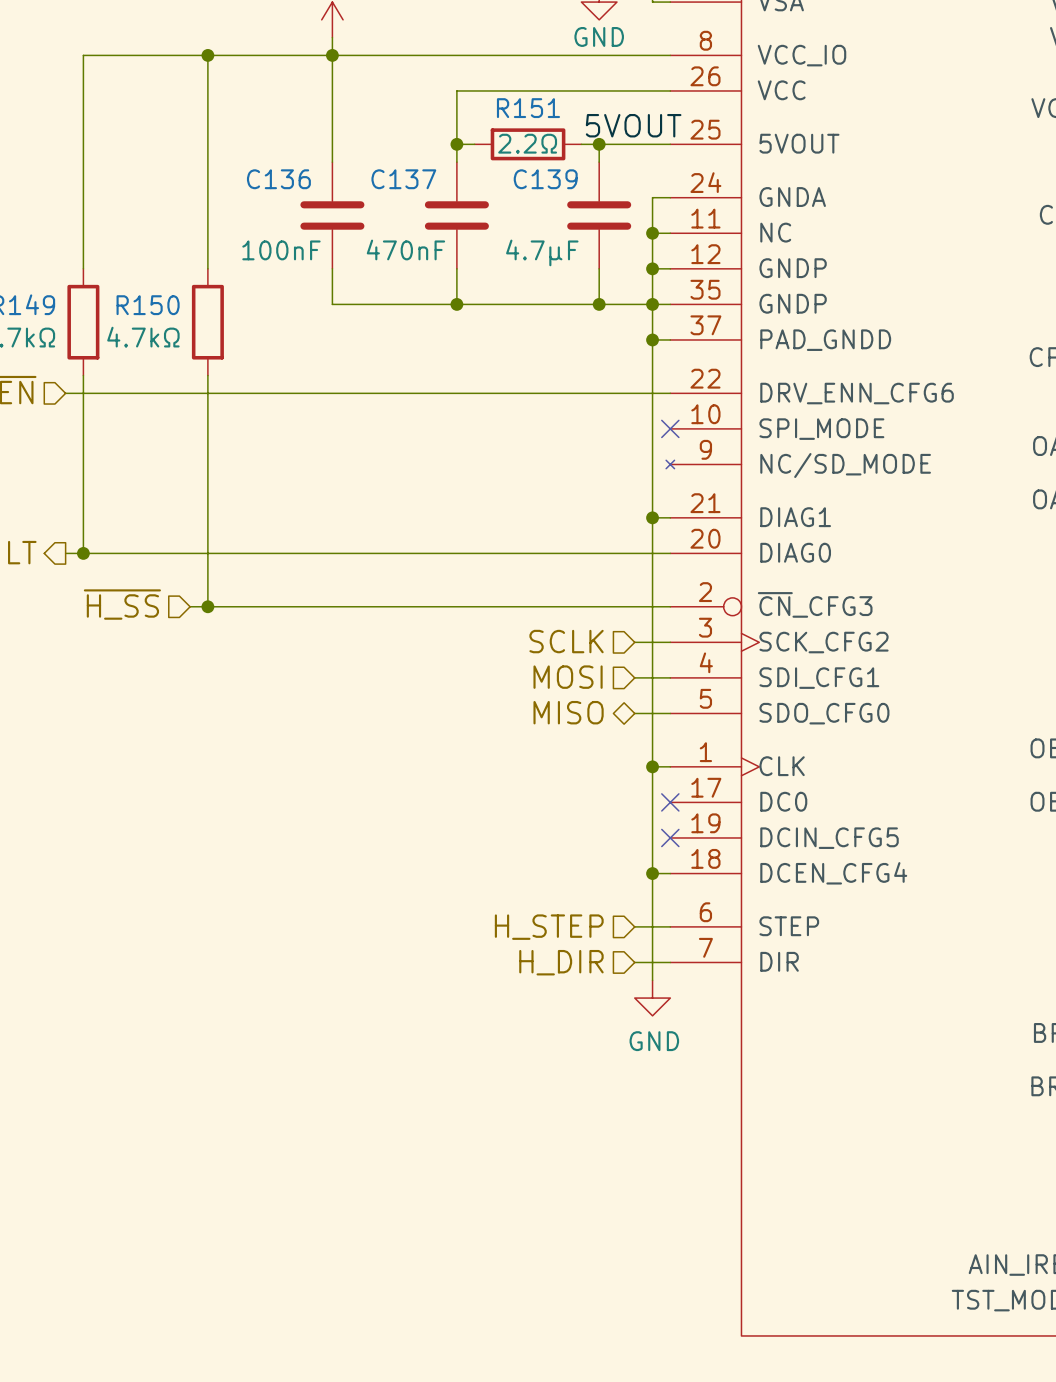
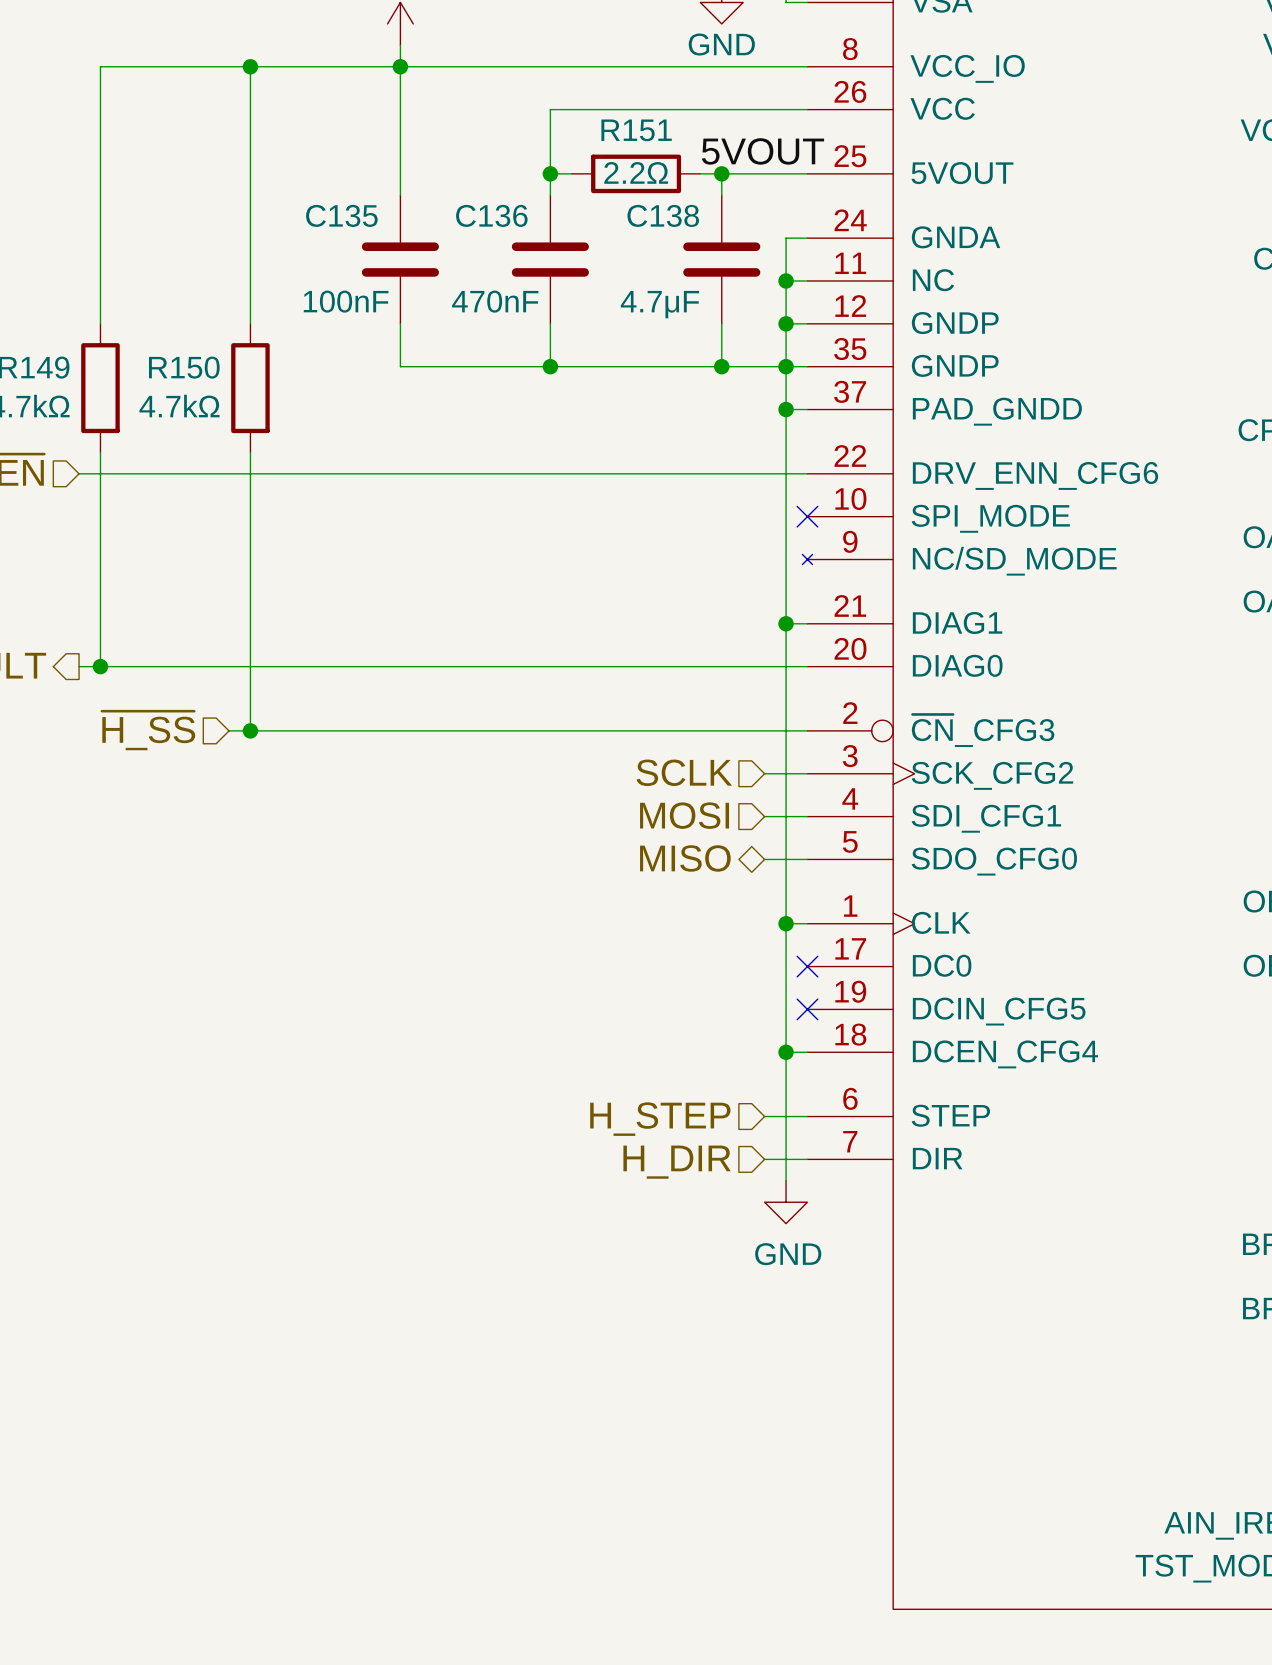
C136 name: C136 (278, 179) -> C135 (341, 215)
C137 name: C137 (403, 179) -> C136 (491, 215)
C139 name: C139 (545, 179) -> C138 (663, 215)

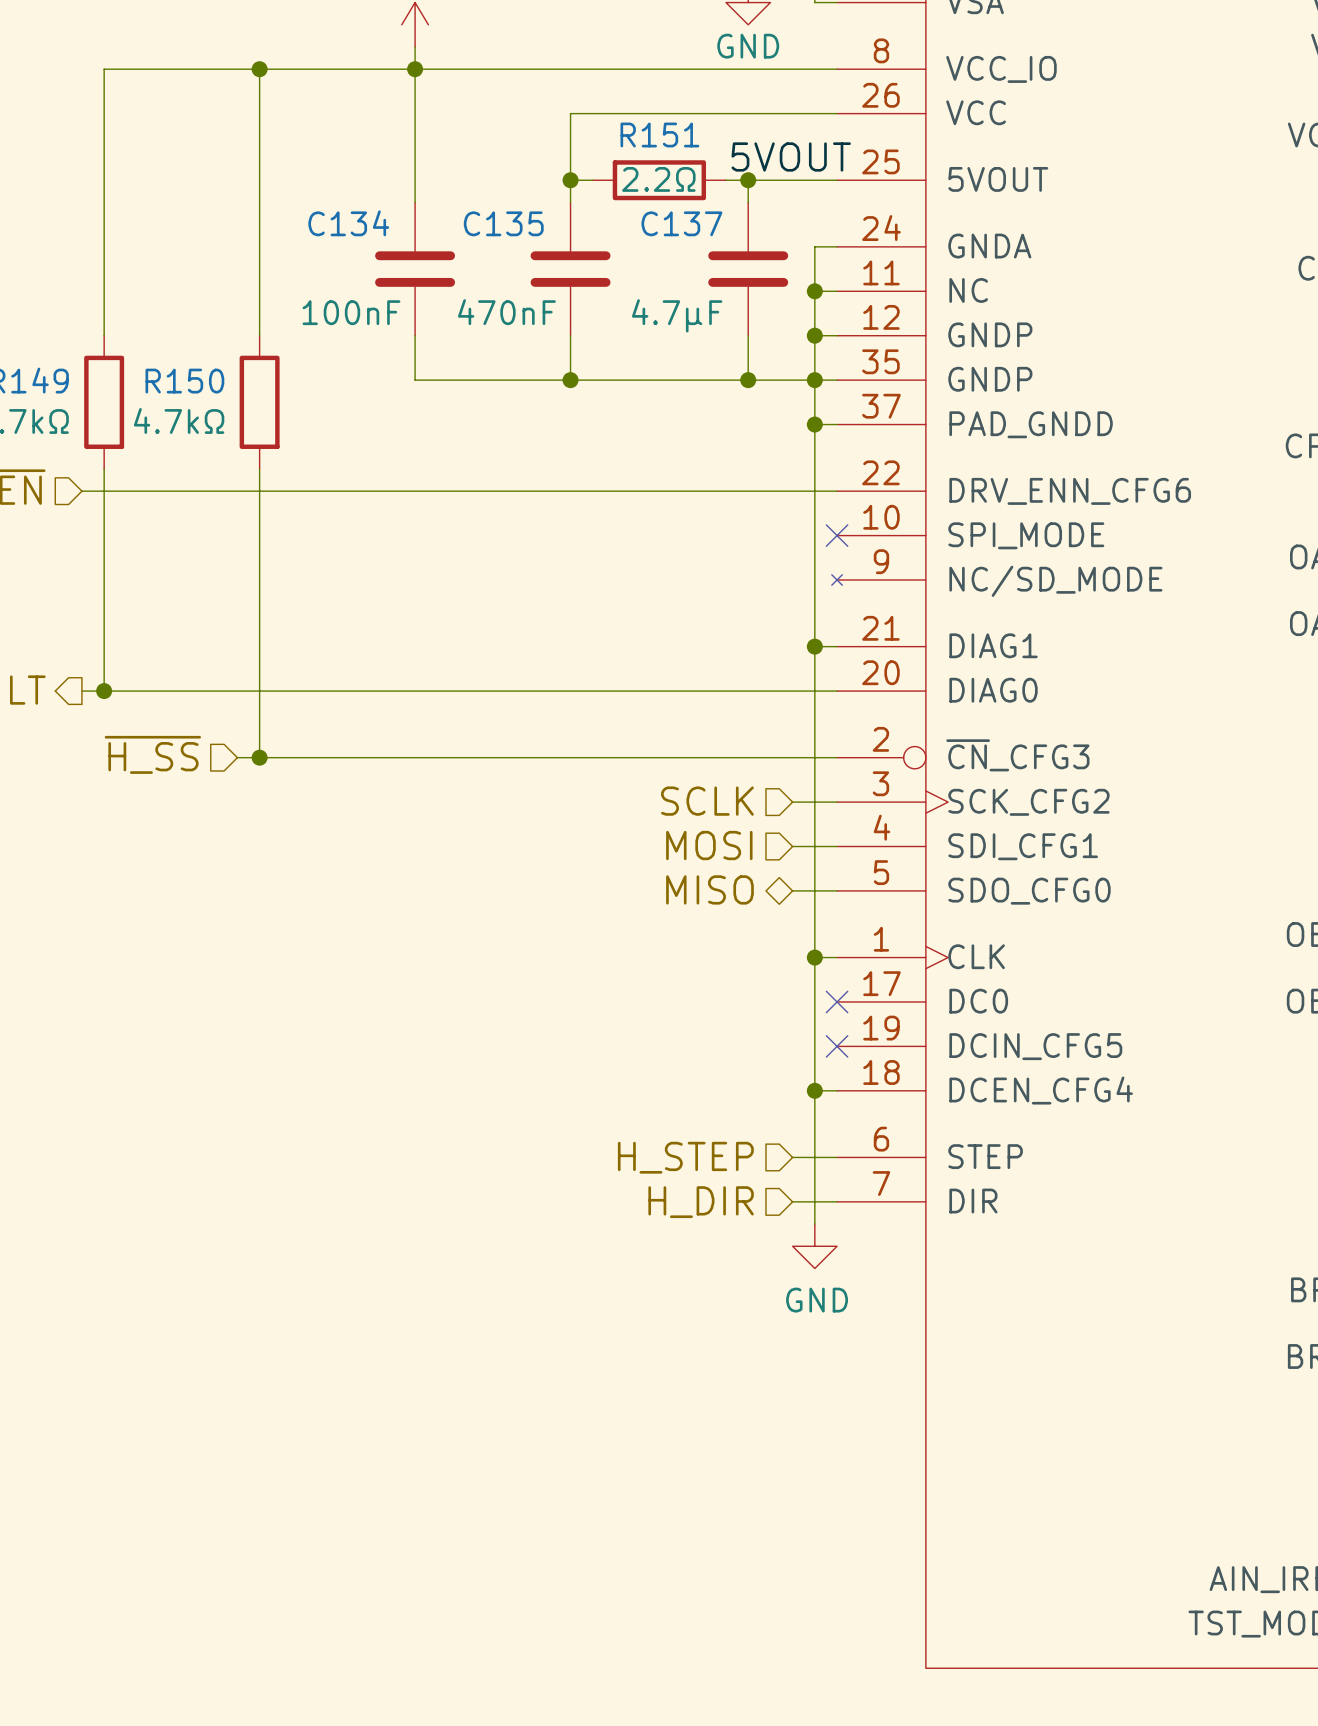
C135 name: C135 (341, 215) -> C134 (348, 223)
C136 name: C136 (491, 215) -> C135 (503, 223)
C138 name: C138 (663, 215) -> C137 (681, 223)

